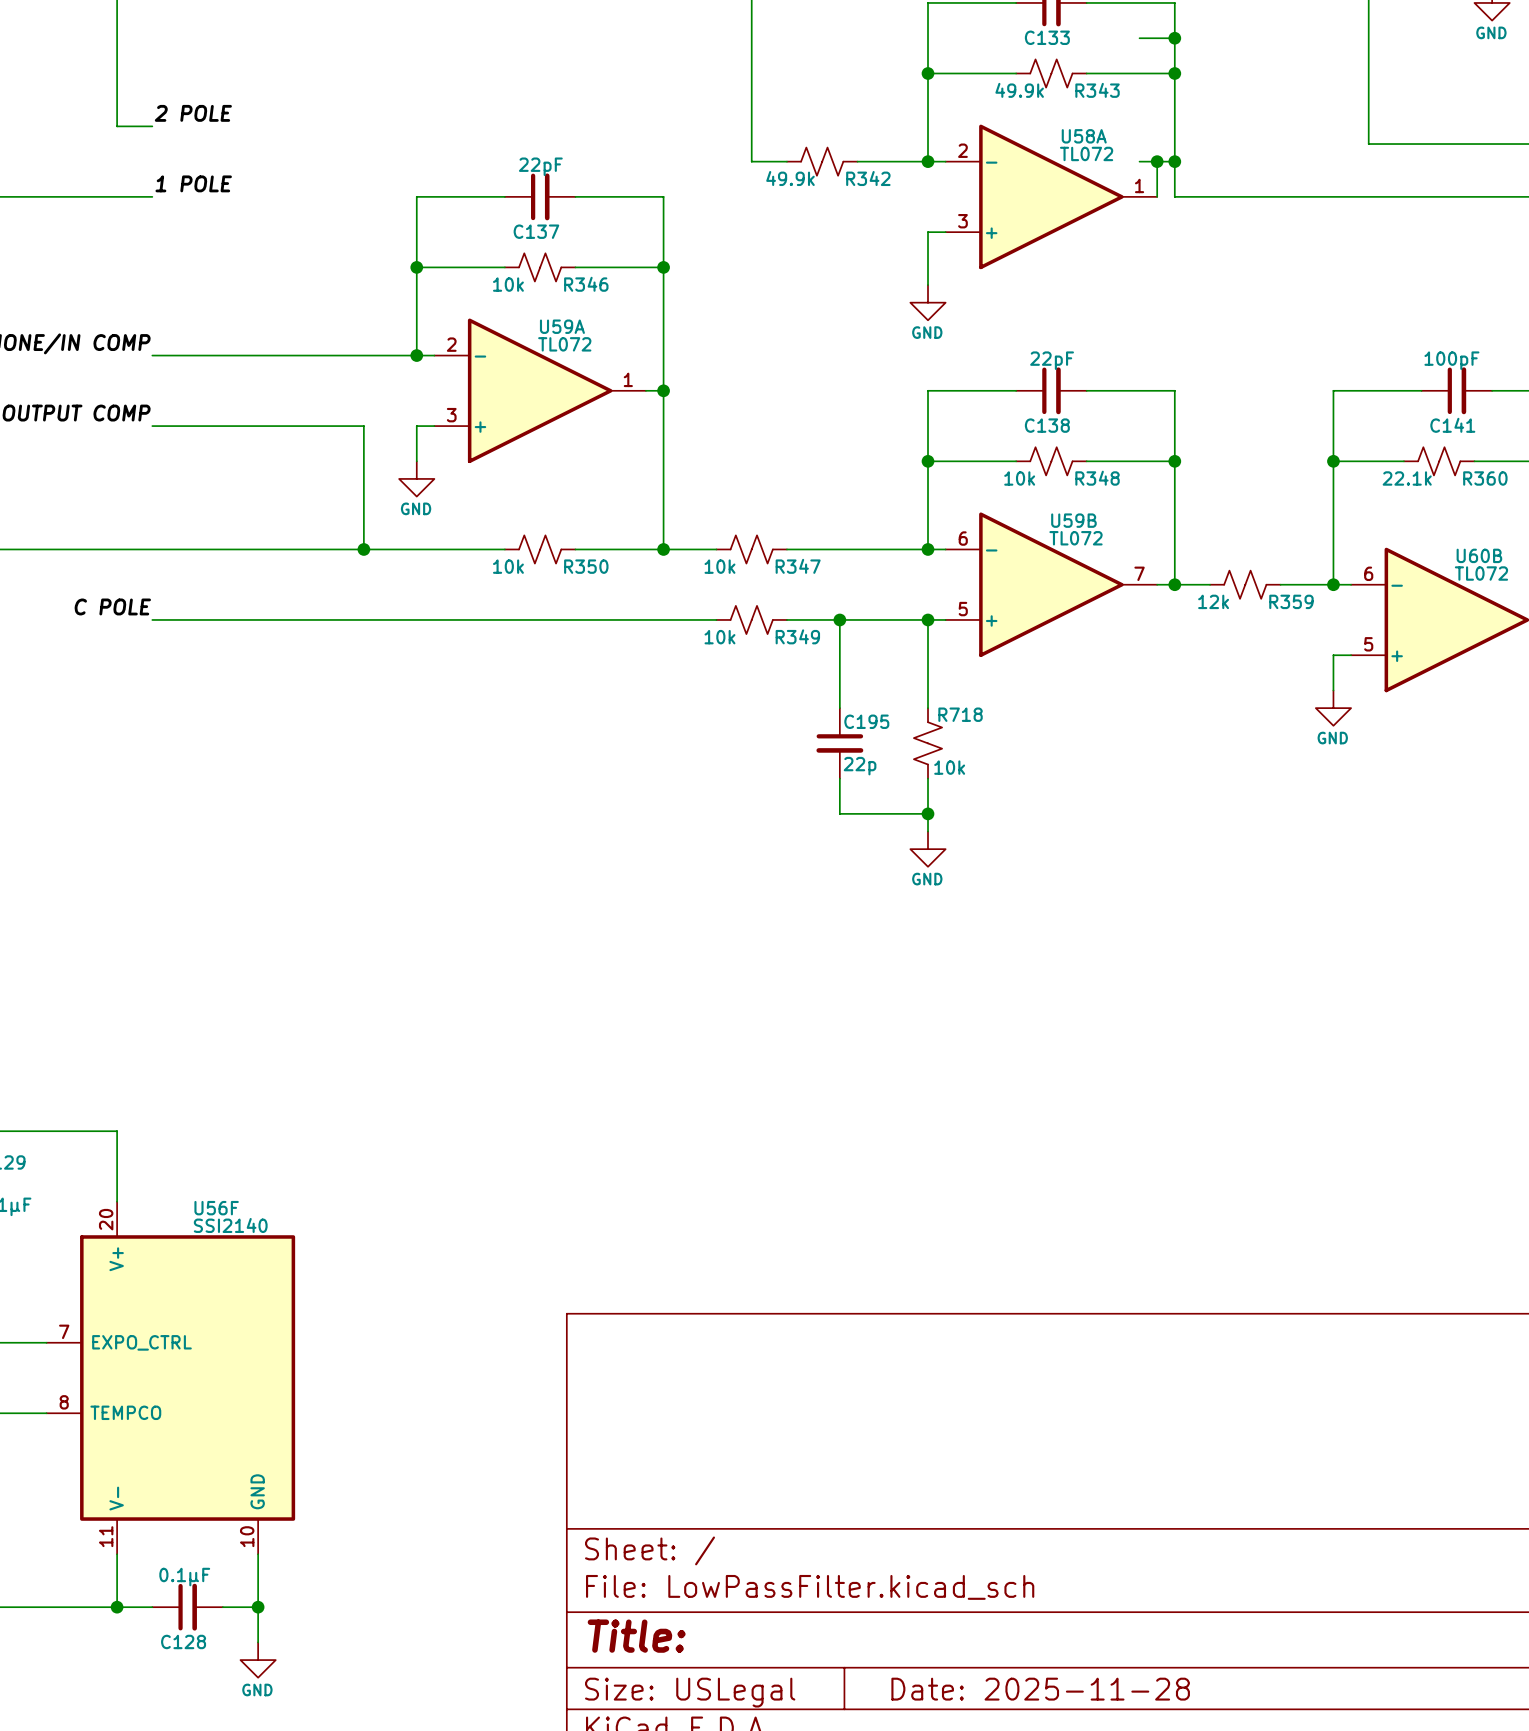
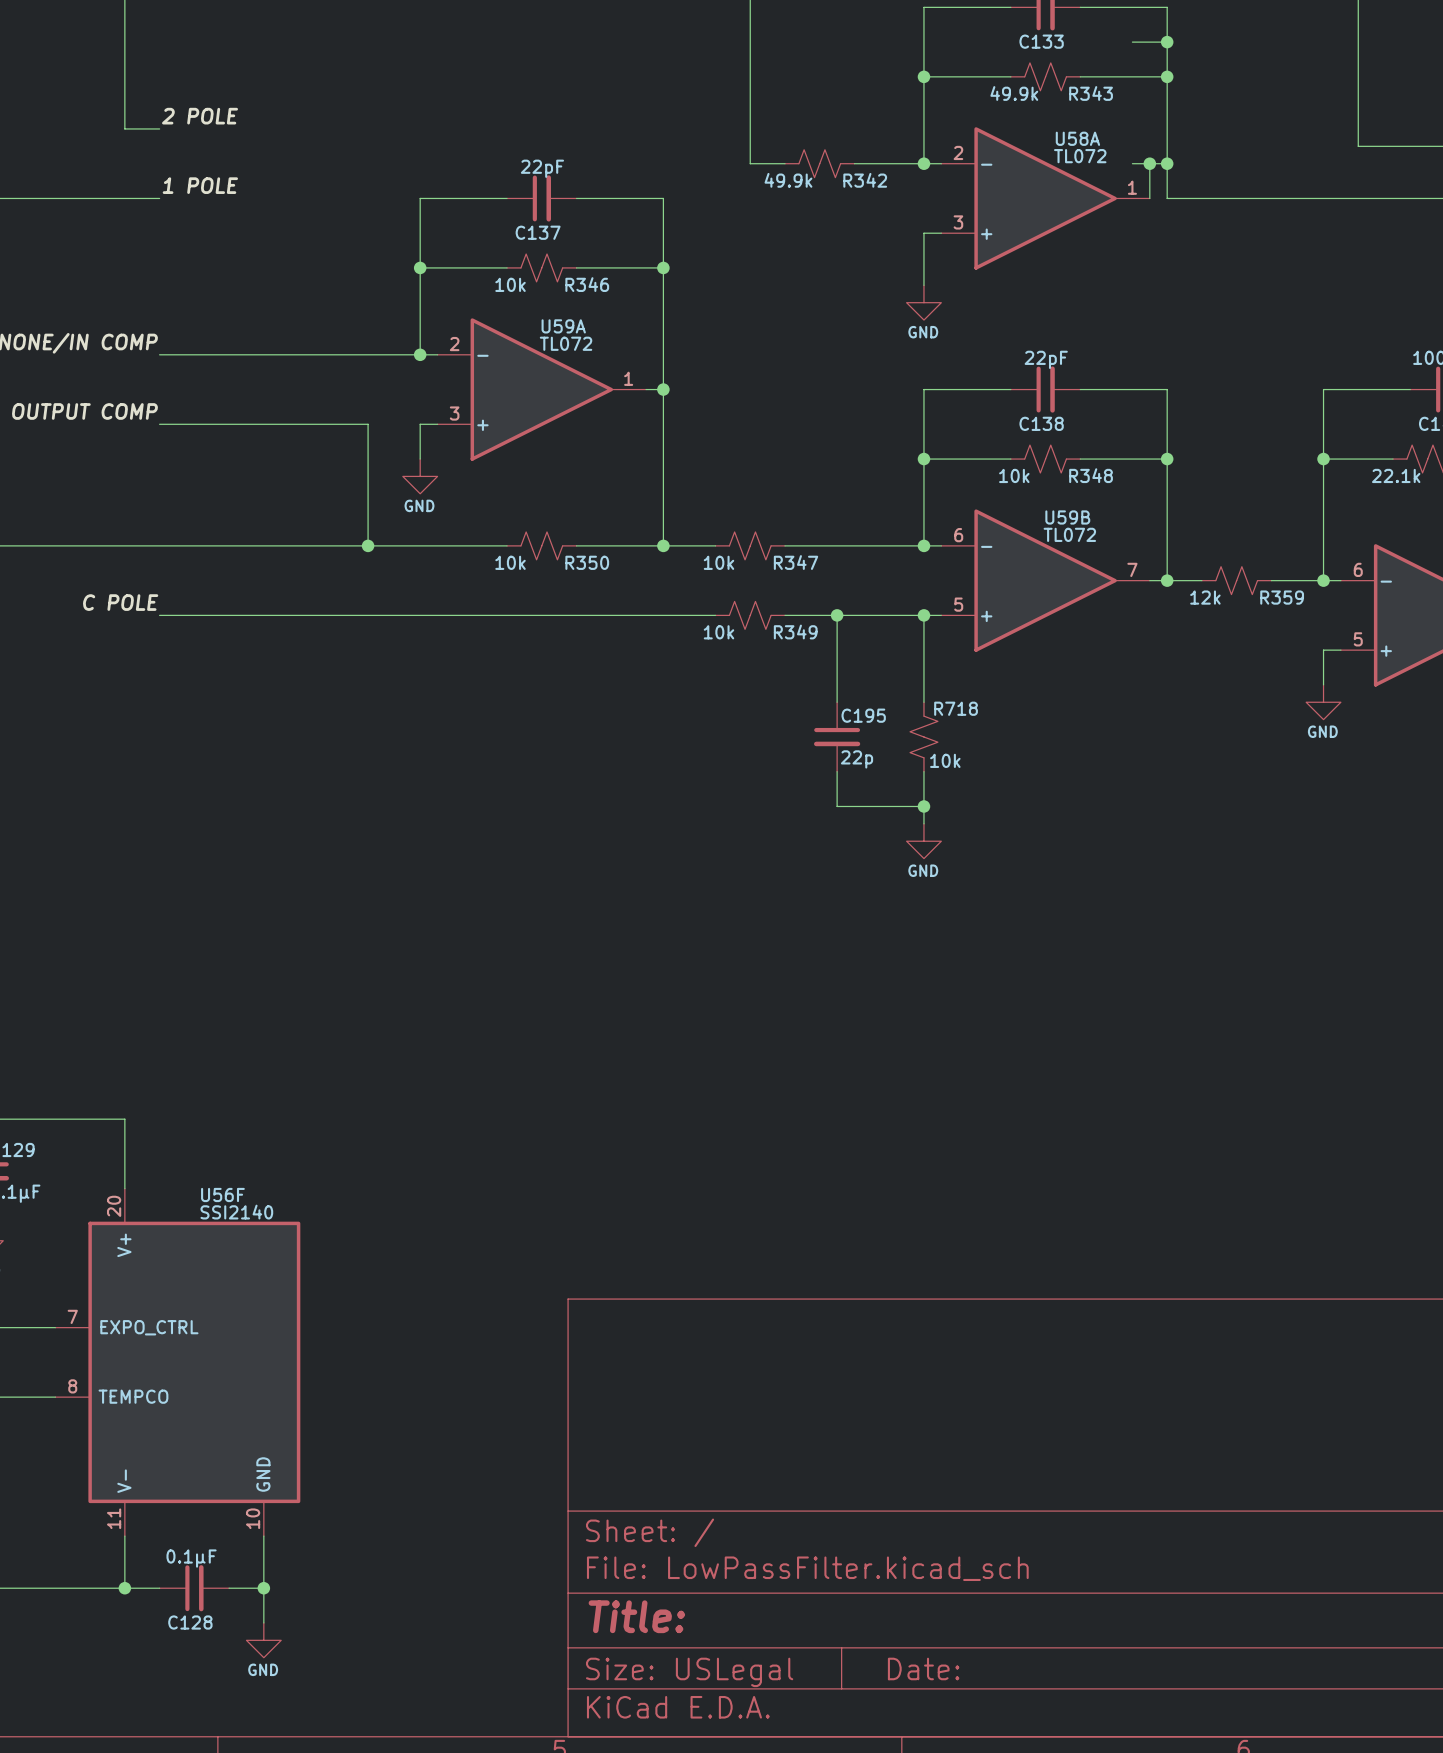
title block: Date: 2025-11-28 (1040, 1689) -> Date: (923, 1668)

